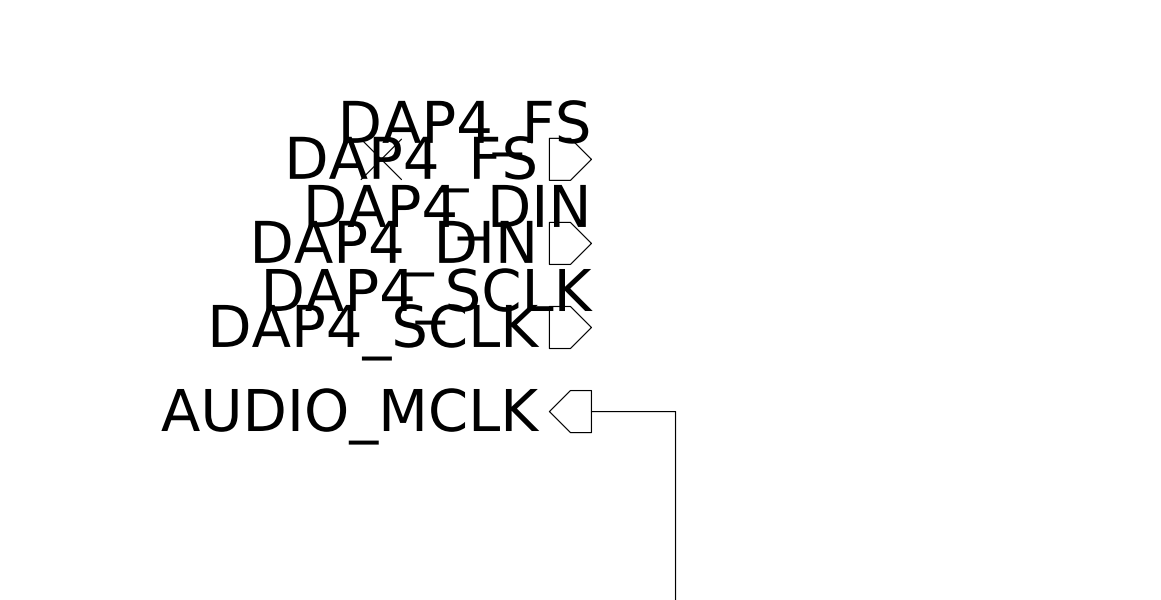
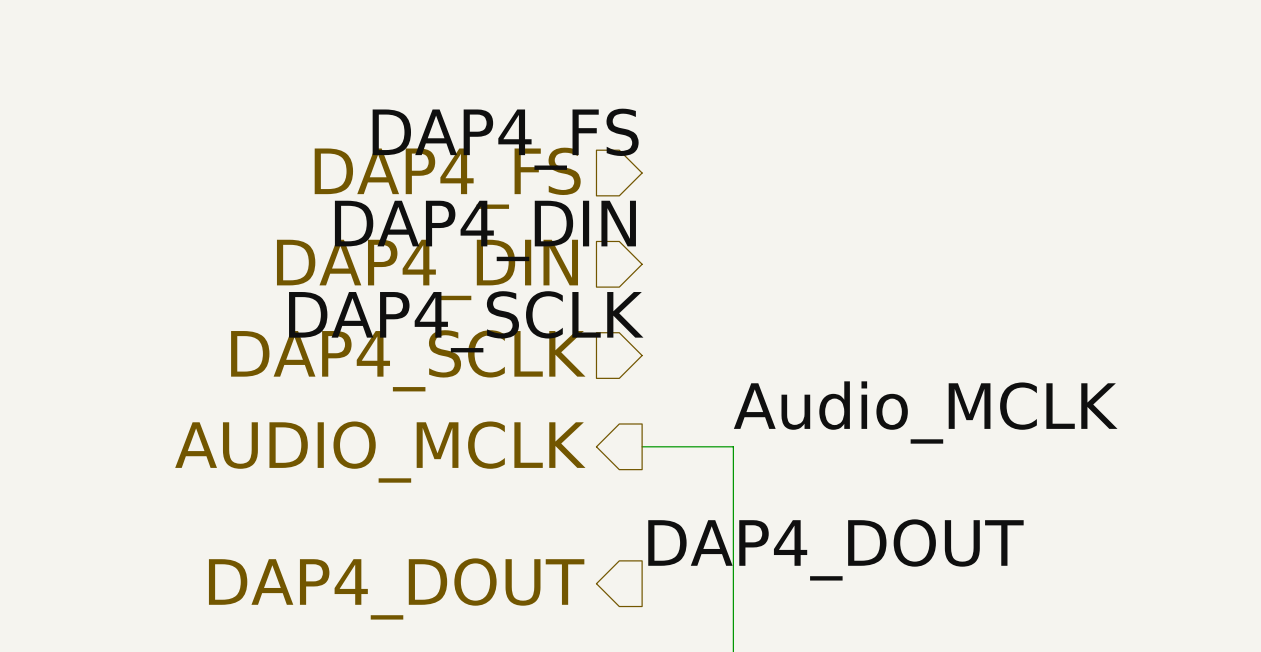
no-connect mark: (381, 159) -> none
label: none -> Audio_MCLK (925, 412)
label: none -> DAP4_DOUT (835, 549)
hierarchical label: none -> DAP4_DOUT (396, 588)

